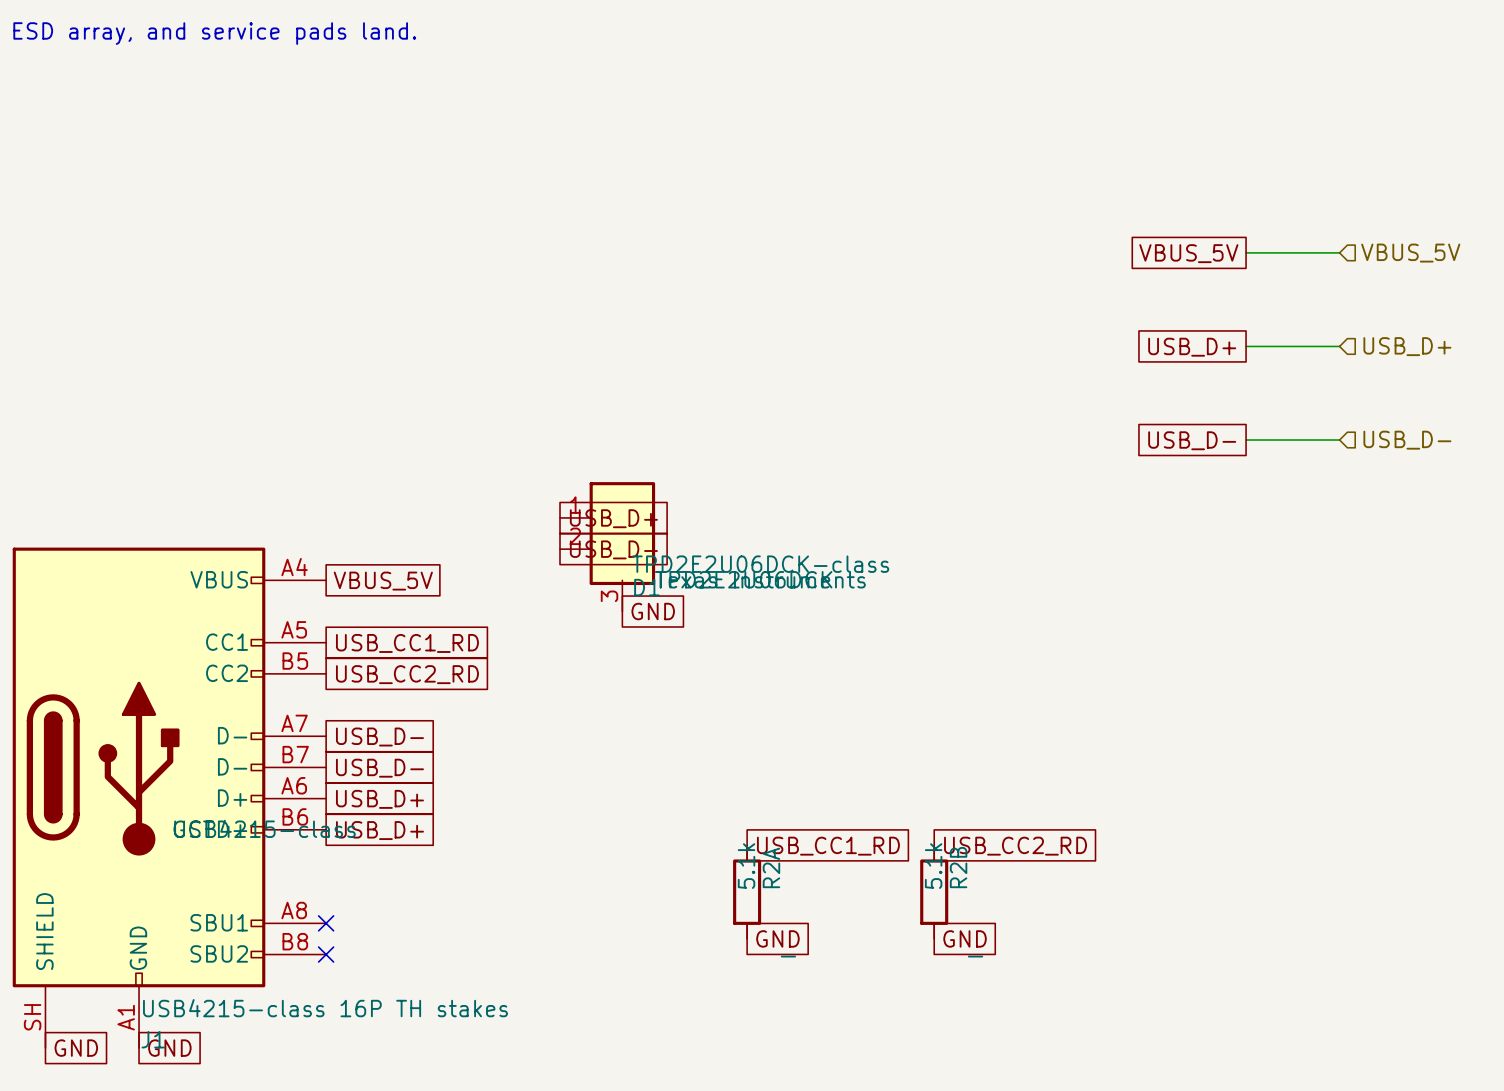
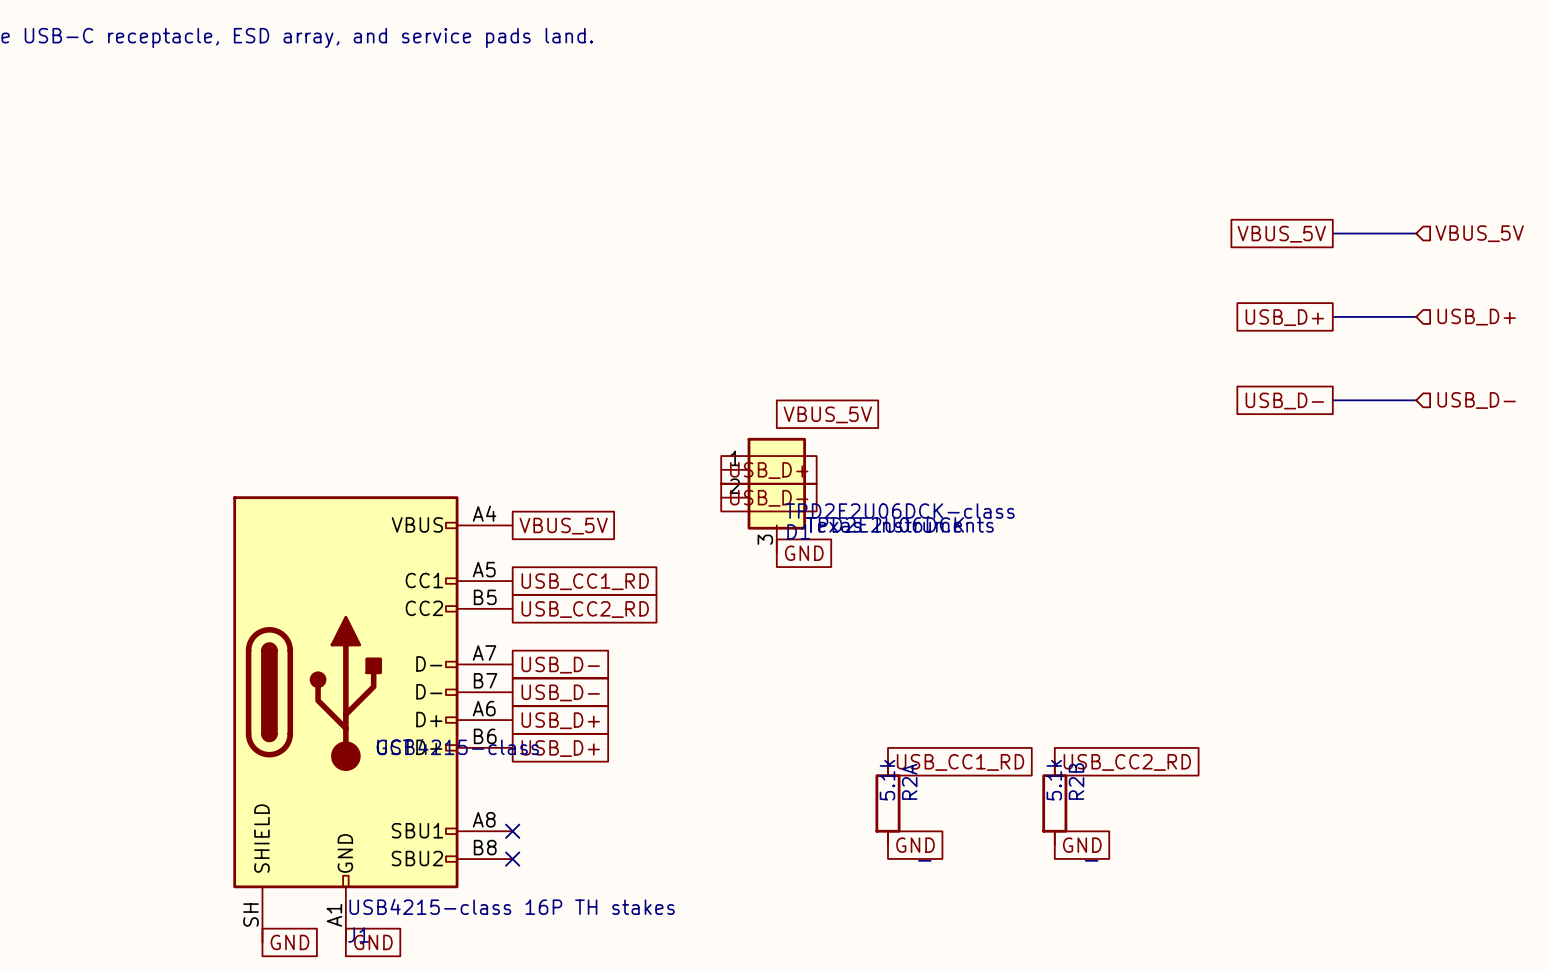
global label: none -> VBUS_5V (827, 414)

